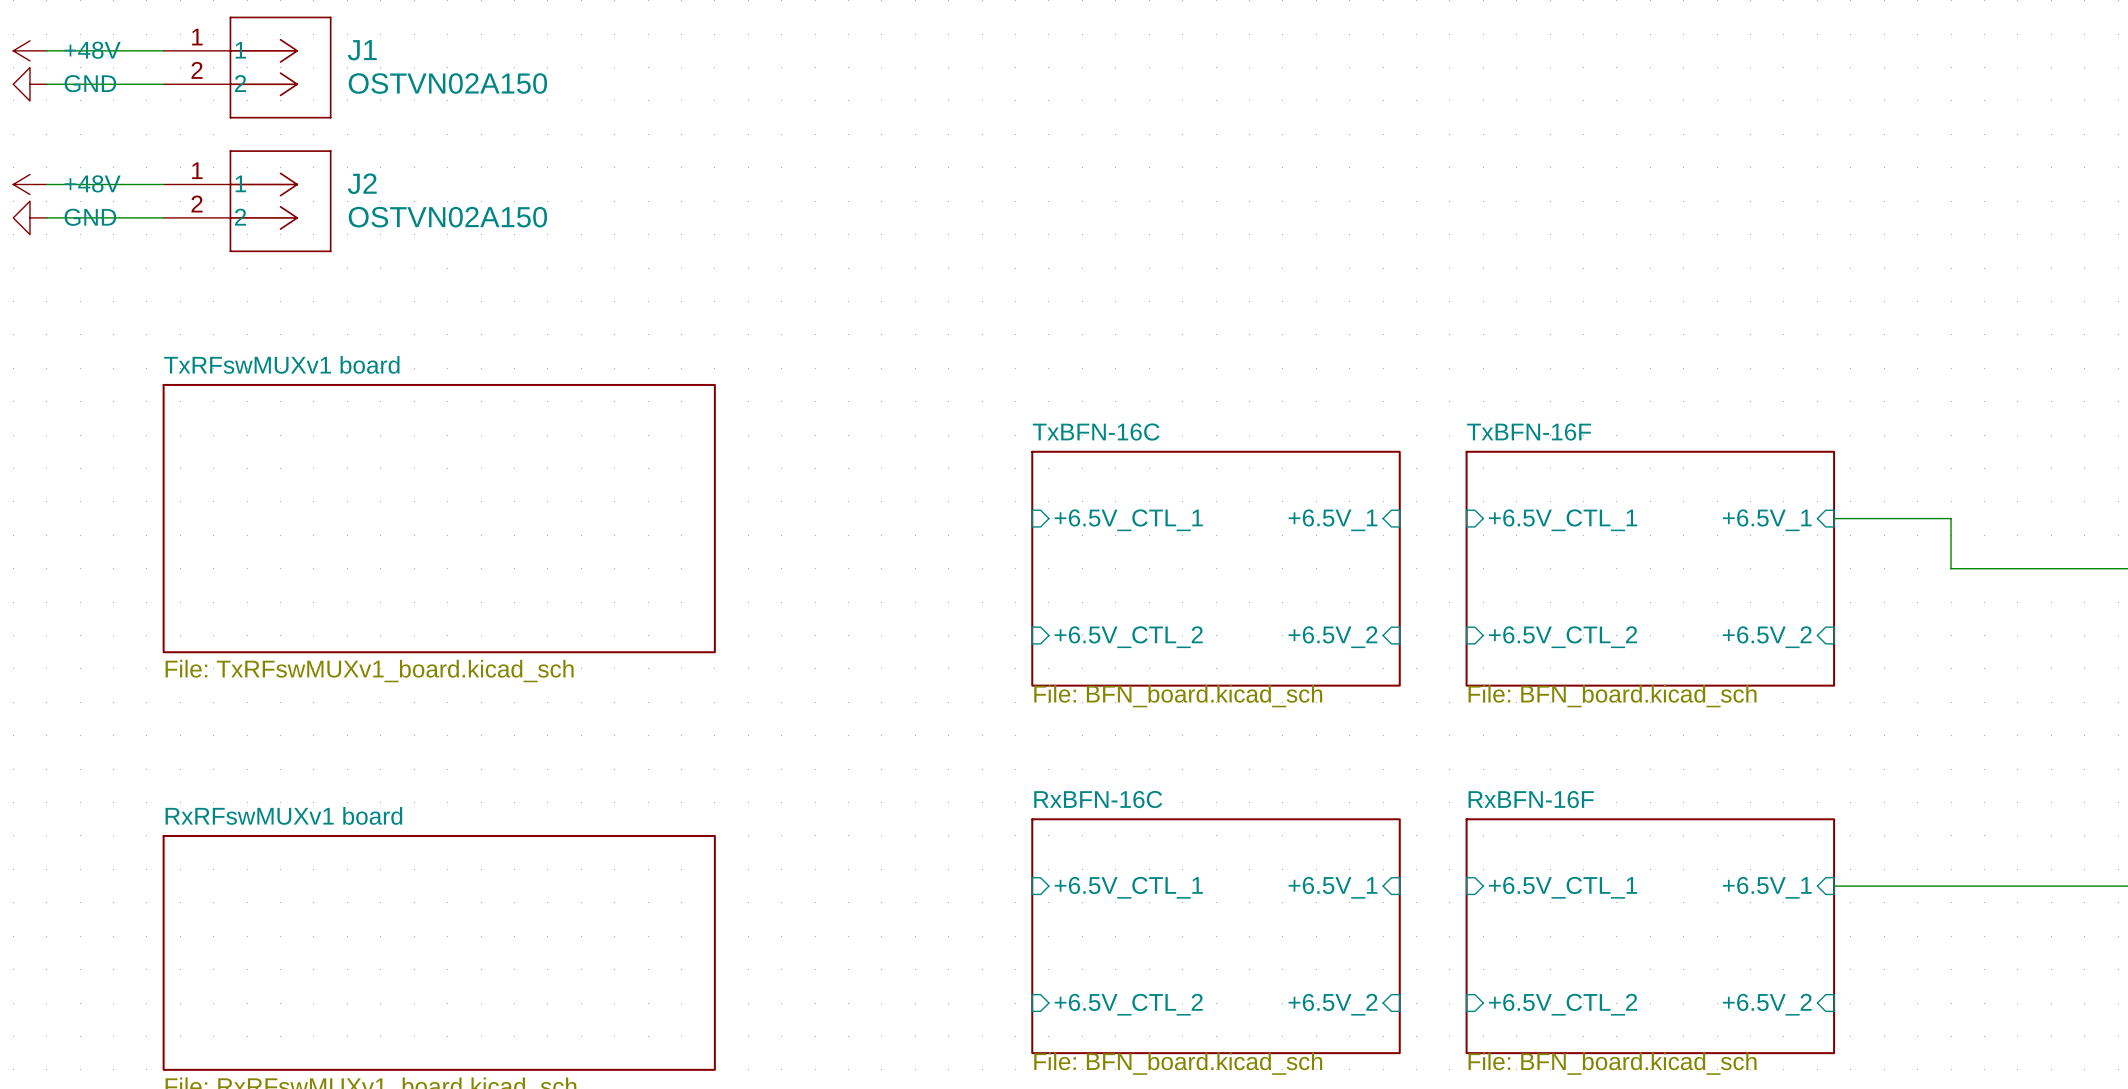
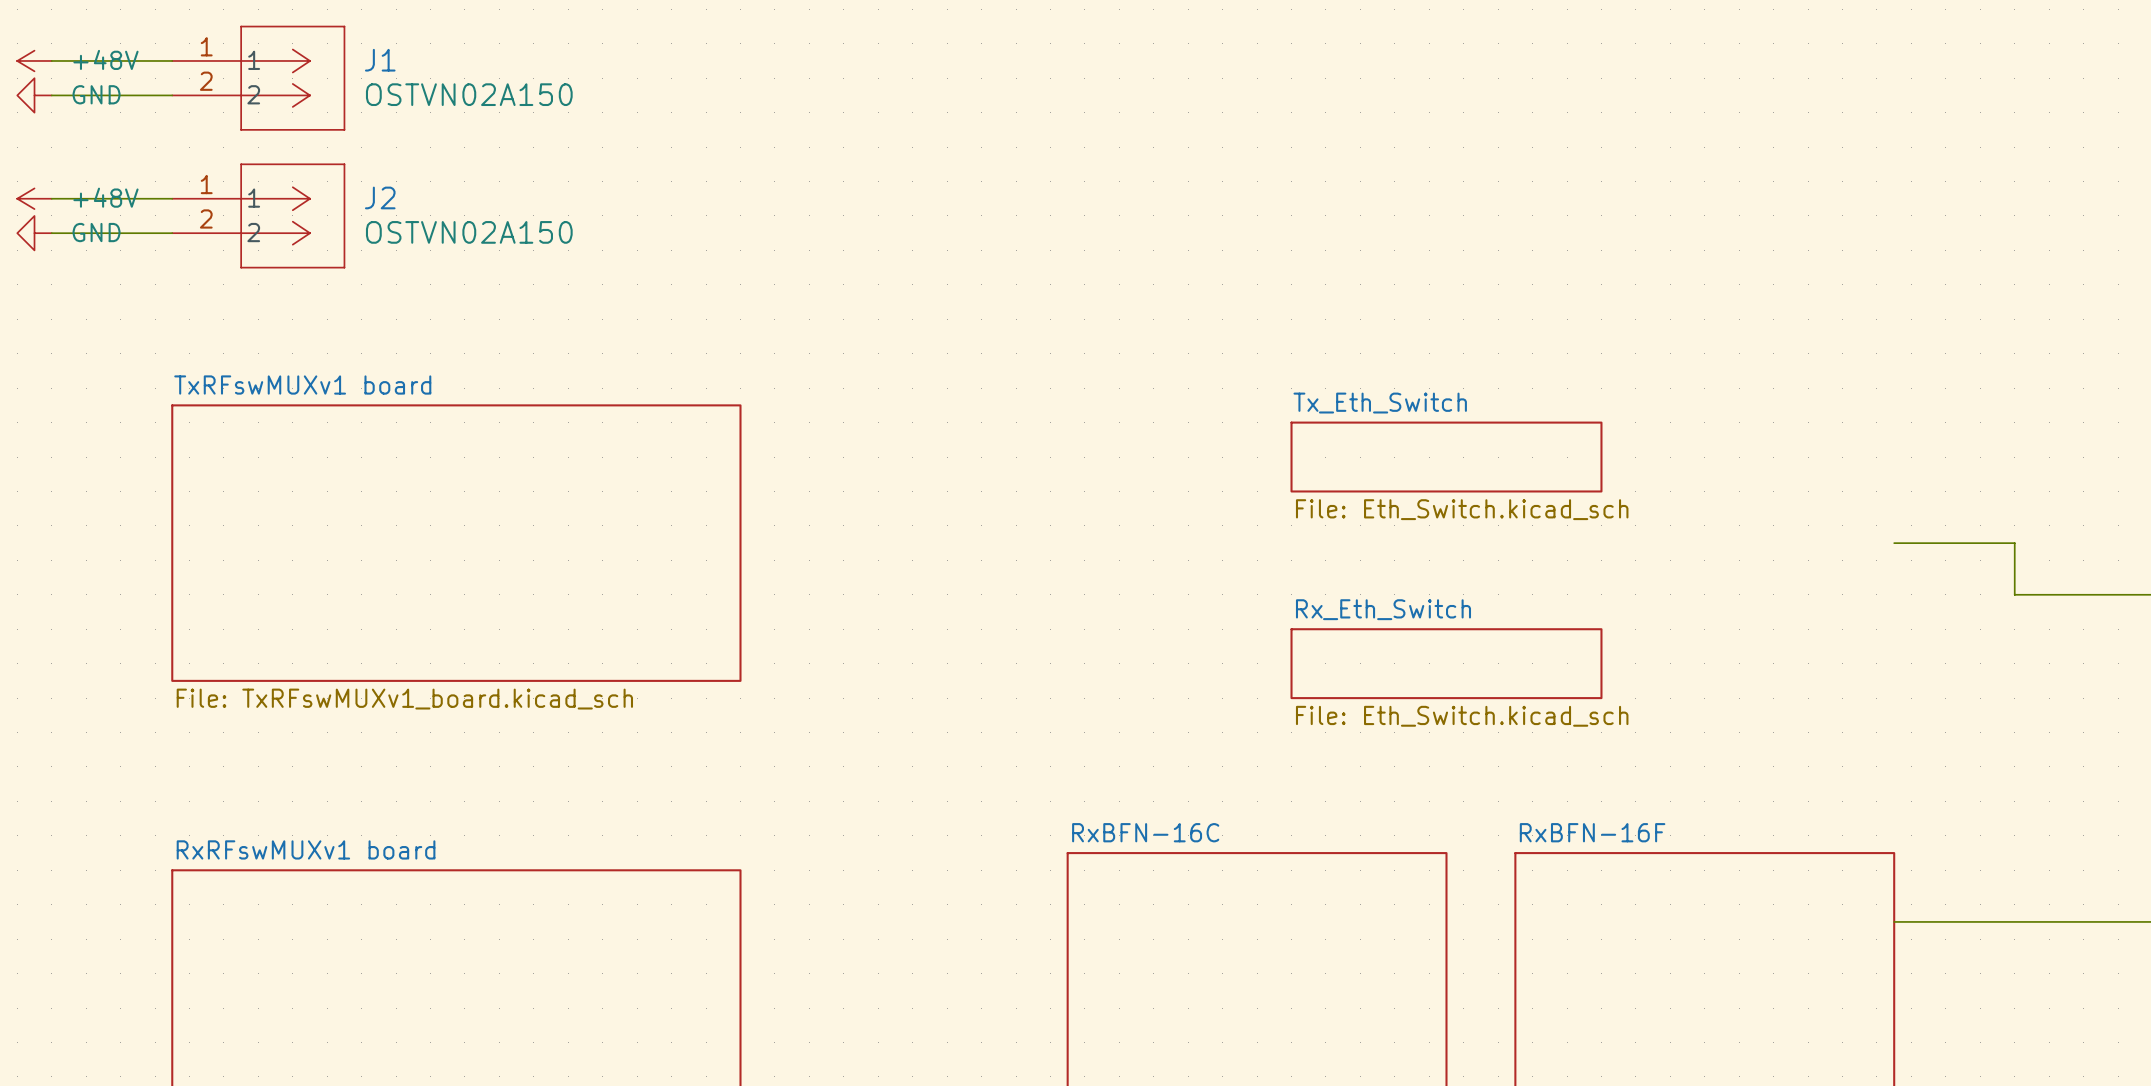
sheet Tx_Eth_Switch: none -> File: Eth_Switch.kicad_sch (1446, 457)
sheet pin: +6.5V_CTL_1 (1128, 520) -> none
sheet pin: +6.5V_1 (1332, 520) -> none
sheet pin: +6.5V_CTL_1 (1563, 520) -> none
sheet pin: +6.5V_1 (1767, 520) -> none
sheet TxBFN-16C: File: BFN_board.kicad_sch (1216, 568) -> none
sheet TxBFN-16F: File: BFN_board.kicad_sch (1650, 568) -> none
sheet Rx_Eth_Switch: none -> File: Eth_Switch.kicad_sch (1446, 663)
sheet pin: +6.5V_CTL_2 (1128, 637) -> none
sheet pin: +6.5V_2 (1332, 637) -> none
sheet pin: +6.5V_CTL_2 (1563, 637) -> none
sheet pin: +6.5V_2 (1767, 637) -> none
sheet pin: +6.5V_CTL_1 (1128, 887) -> none
sheet pin: +6.5V_1 (1332, 887) -> none
sheet pin: +6.5V_CTL_1 (1563, 887) -> none
sheet pin: +6.5V_1 (1767, 887) -> none
sheet pin: +6.5V_CTL_2 (1128, 1004) -> none
sheet pin: +6.5V_2 (1332, 1004) -> none
sheet pin: +6.5V_CTL_2 (1563, 1004) -> none
sheet pin: +6.5V_2 (1767, 1004) -> none

